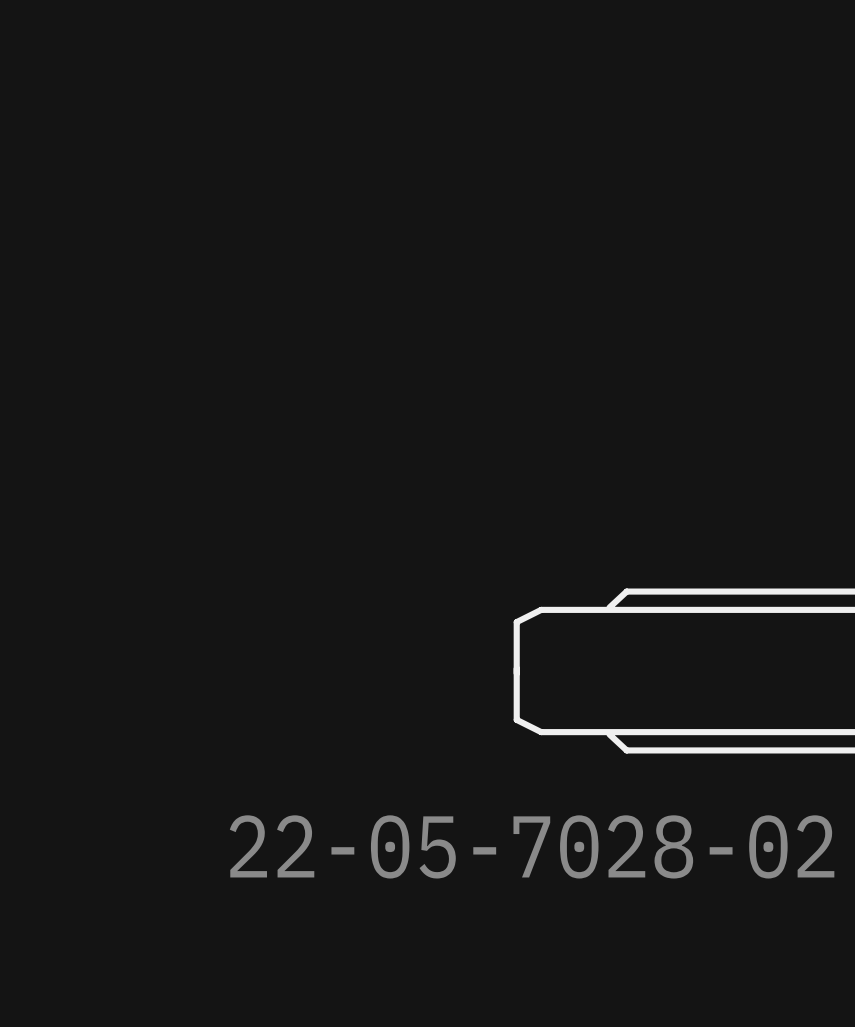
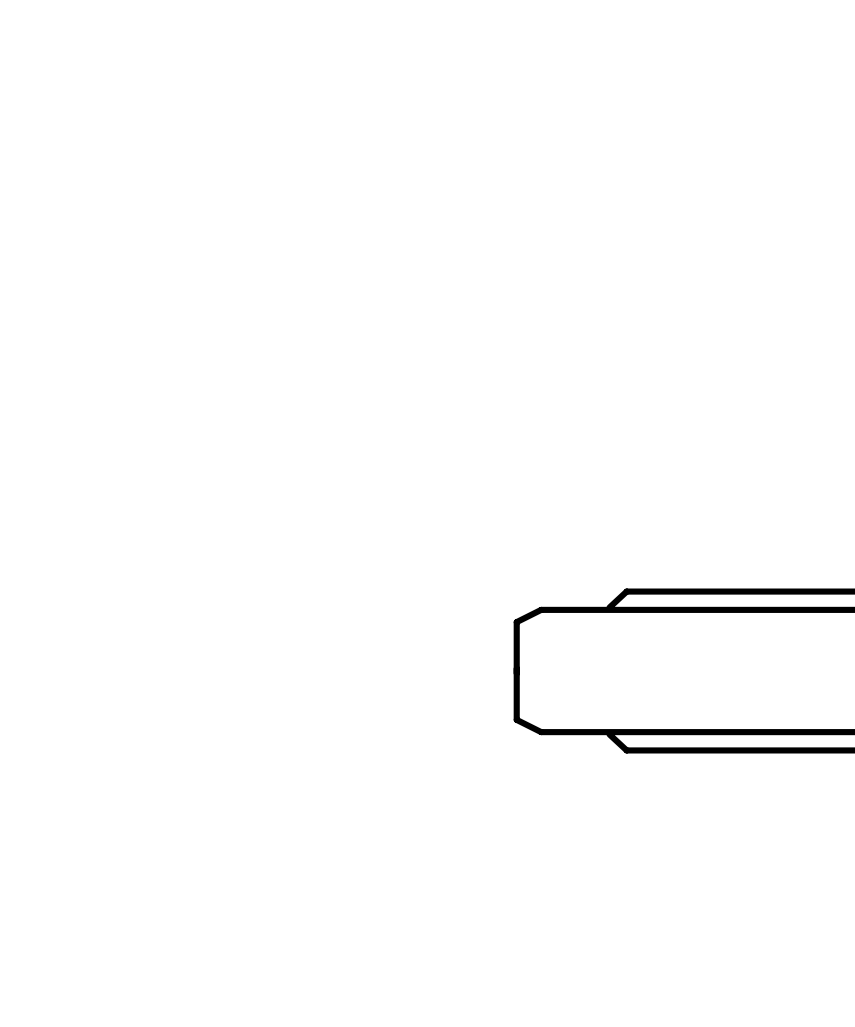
part value: 22-05-7028-02 (532, 846) -> none

